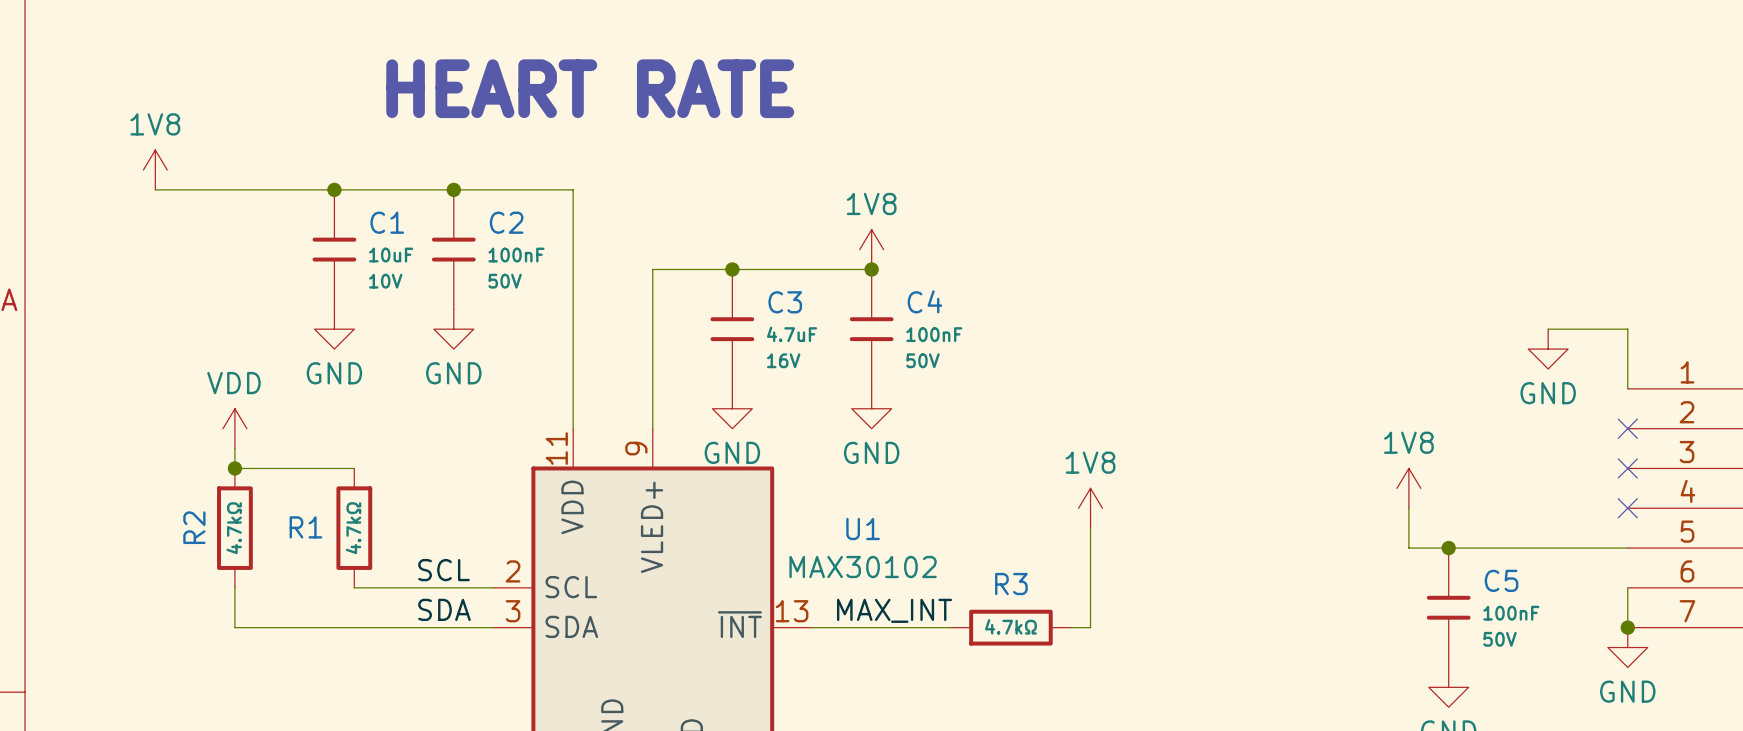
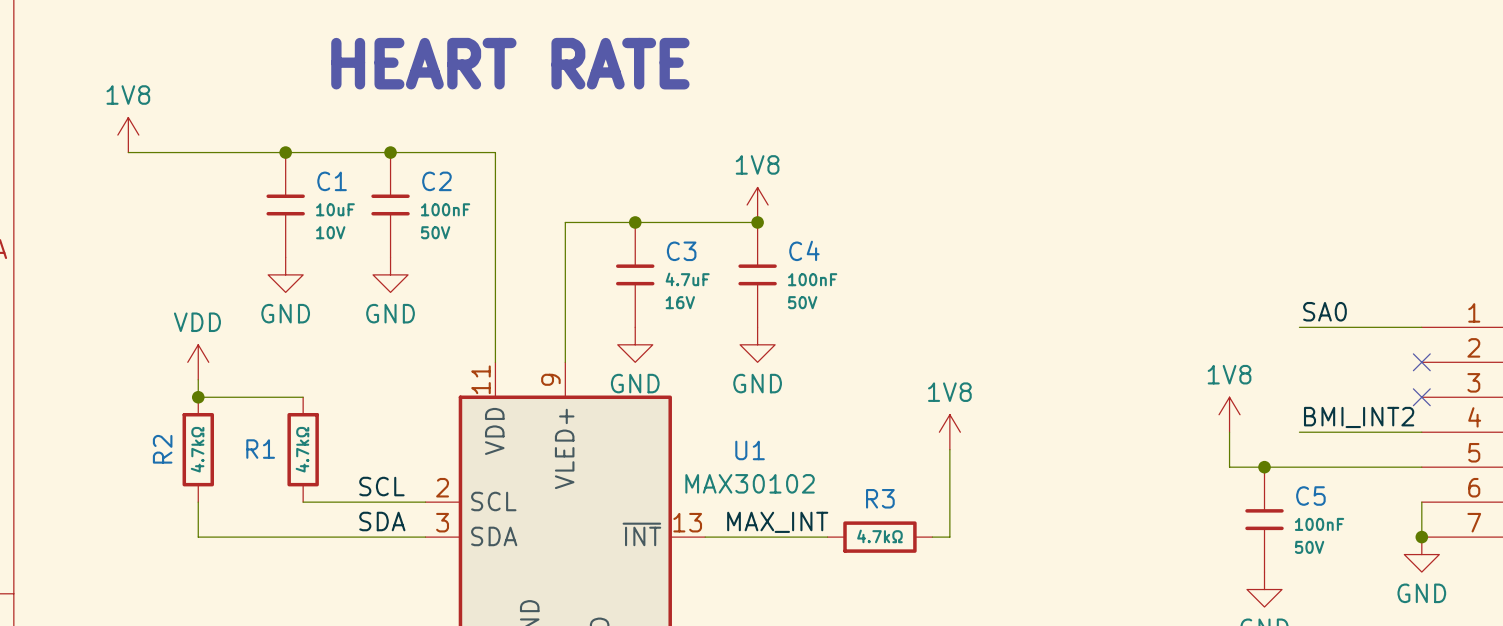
wire: (1548, 329) (1627, 329) (1627, 388) -> (1299, 327) (1421, 327)
power symbol: GND (1548, 349) -> none
label: none -> SA0 (1324, 311)
label: none -> BMI_INT2 (1359, 417)
wire: none -> (1299, 432) (1421, 432)
no-connect mark: (1627, 508) -> none

